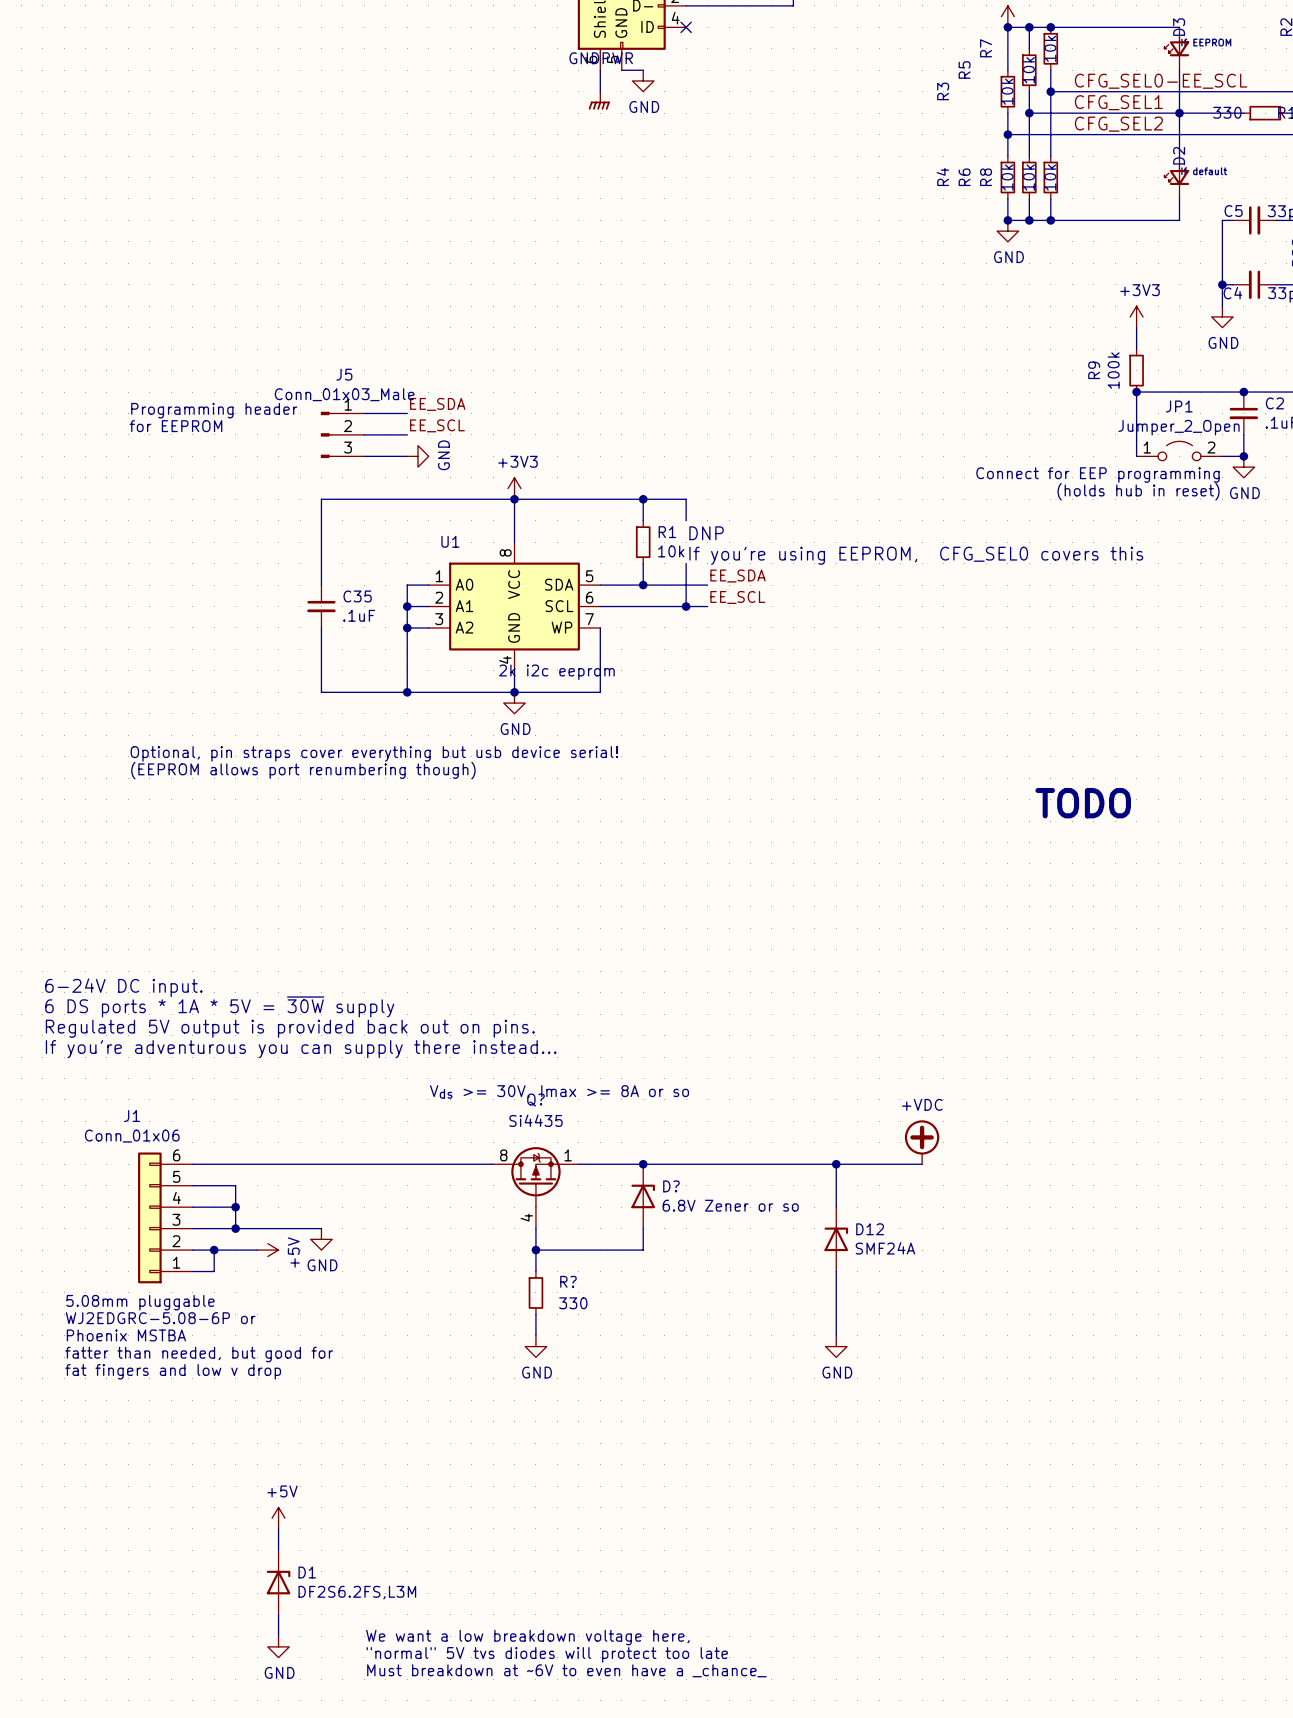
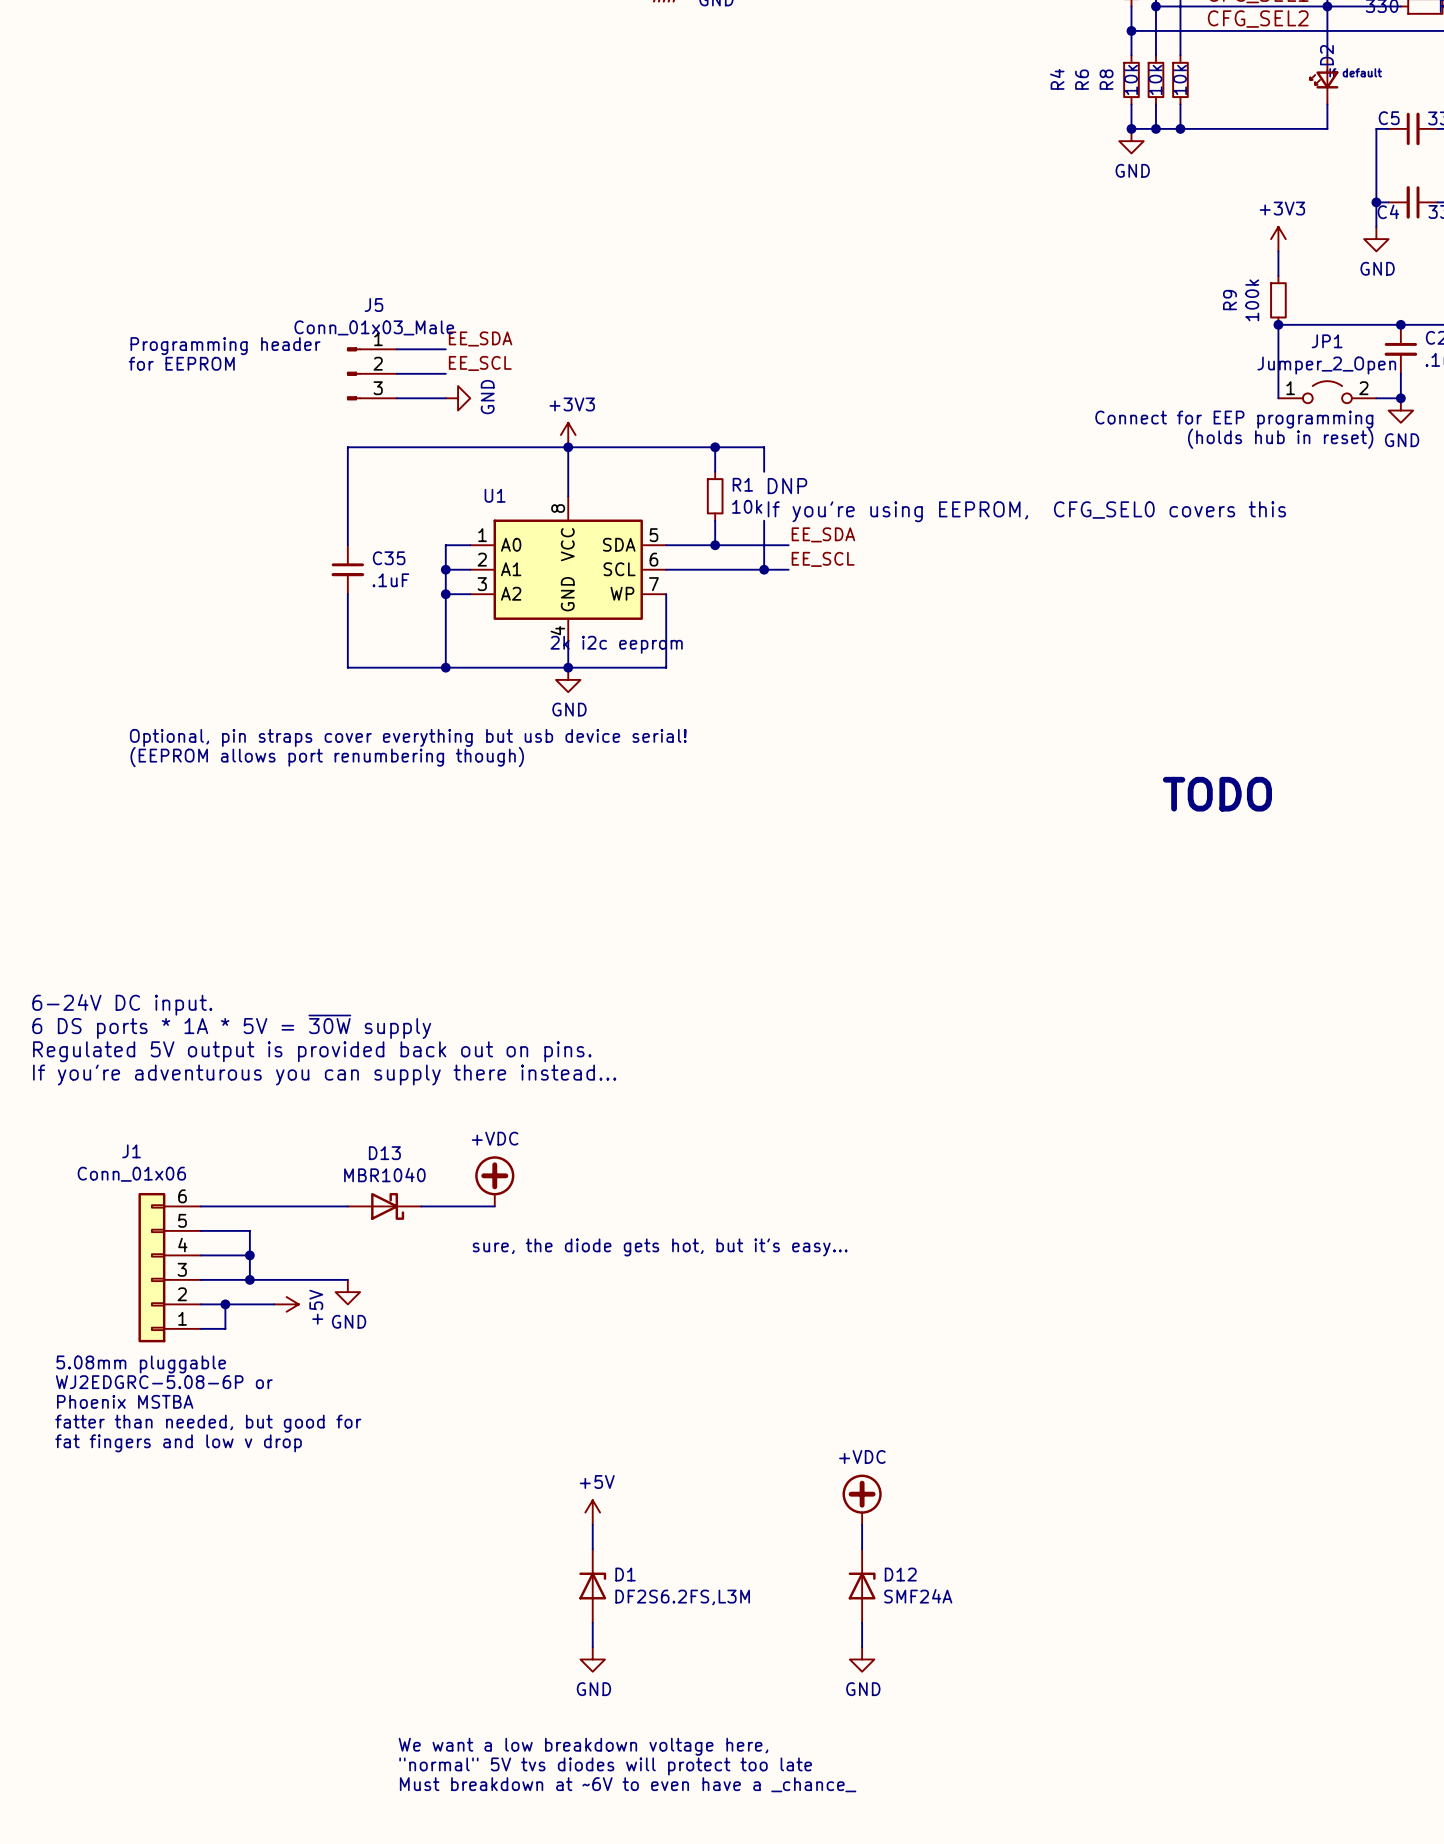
text: Vds >= 30V, Imax >= 8A or so (559, 1091) -> none
power symbol: none -> +VDC (494, 1181)
power symbol: +VDC (922, 1142) -> none
D13: none -> MBR1040 (384, 1206)
wire: (450, 1164) (493, 1164) -> none
wire: (578, 1164) (922, 1164) -> none
junction: (643, 1164) -> none
wire: (836, 1164) (836, 1207) -> none
junction: (836, 1164) -> none
Q?: Si4435 (535, 1187) -> none
D?: 6.8V Zener or so (643, 1196) -> none
text: none -> sure, the diode gets hot, but it's easy... (660, 1247)
wire: (535, 1228) (535, 1271) -> none
wire: (643, 1228) (643, 1250) (535, 1250) -> none
D12 position: (836, 1239) -> (862, 1586)
junction: (535, 1250) -> none
wire: (836, 1271) (836, 1335) -> none
R?: 330 (535, 1292) -> none
wire: (535, 1314) (535, 1335) -> (592, 1524) (592, 1549)
power symbol: GND (535, 1346) -> none
power symbol: GND (836, 1346) -> none
power symbol: none -> +VDC (862, 1499)
power symbol: none -> +5V (592, 1512)
wire: none -> (862, 1524) (862, 1549)
power symbol: +5V (278, 1518) -> none
wire: (278, 1528) (278, 1550) -> none
wire: none -> (592, 1622) (592, 1647)
wire: none -> (862, 1622) (862, 1647)
power symbol: none -> GND (592, 1659)
power symbol: none -> GND (862, 1659)
D1 position: (278, 1582) -> (592, 1586)
wire: (278, 1614) (278, 1636) -> none
power symbol: GND (278, 1646) -> none

